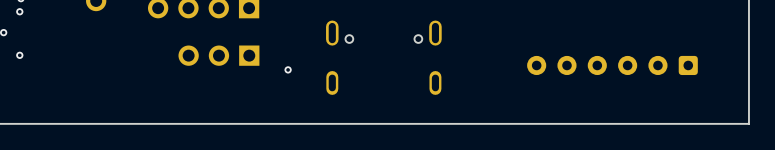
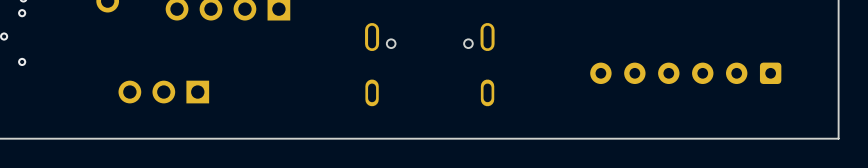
part position: (218, 55) -> (163, 92)
via: (288, 69) -> none

